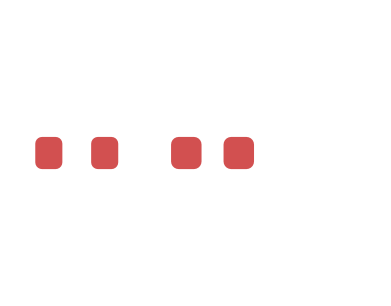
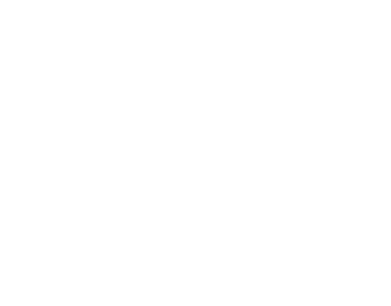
part: (76, 153) -> none
part: (212, 153) -> none

